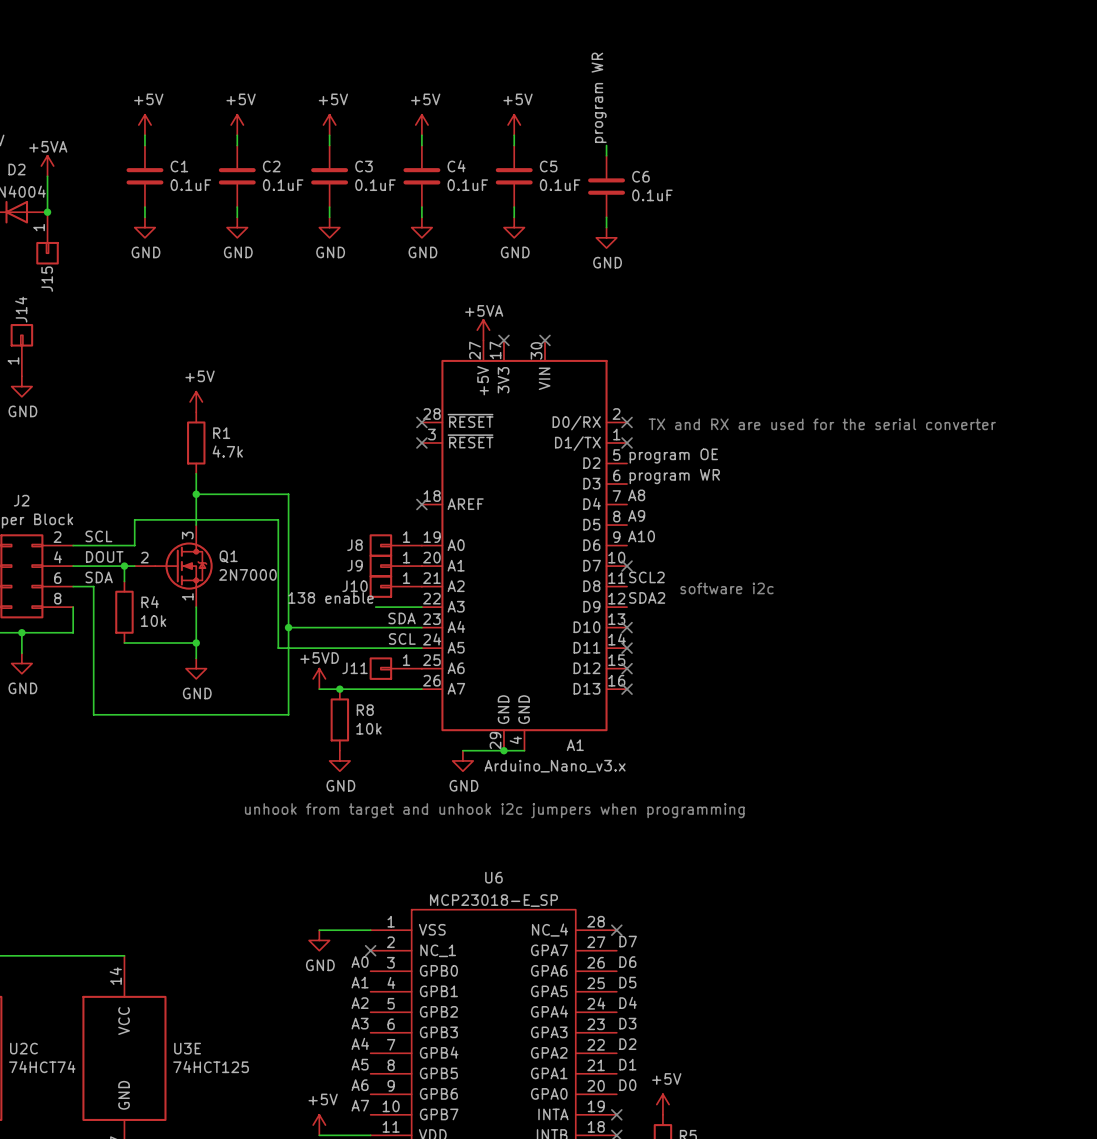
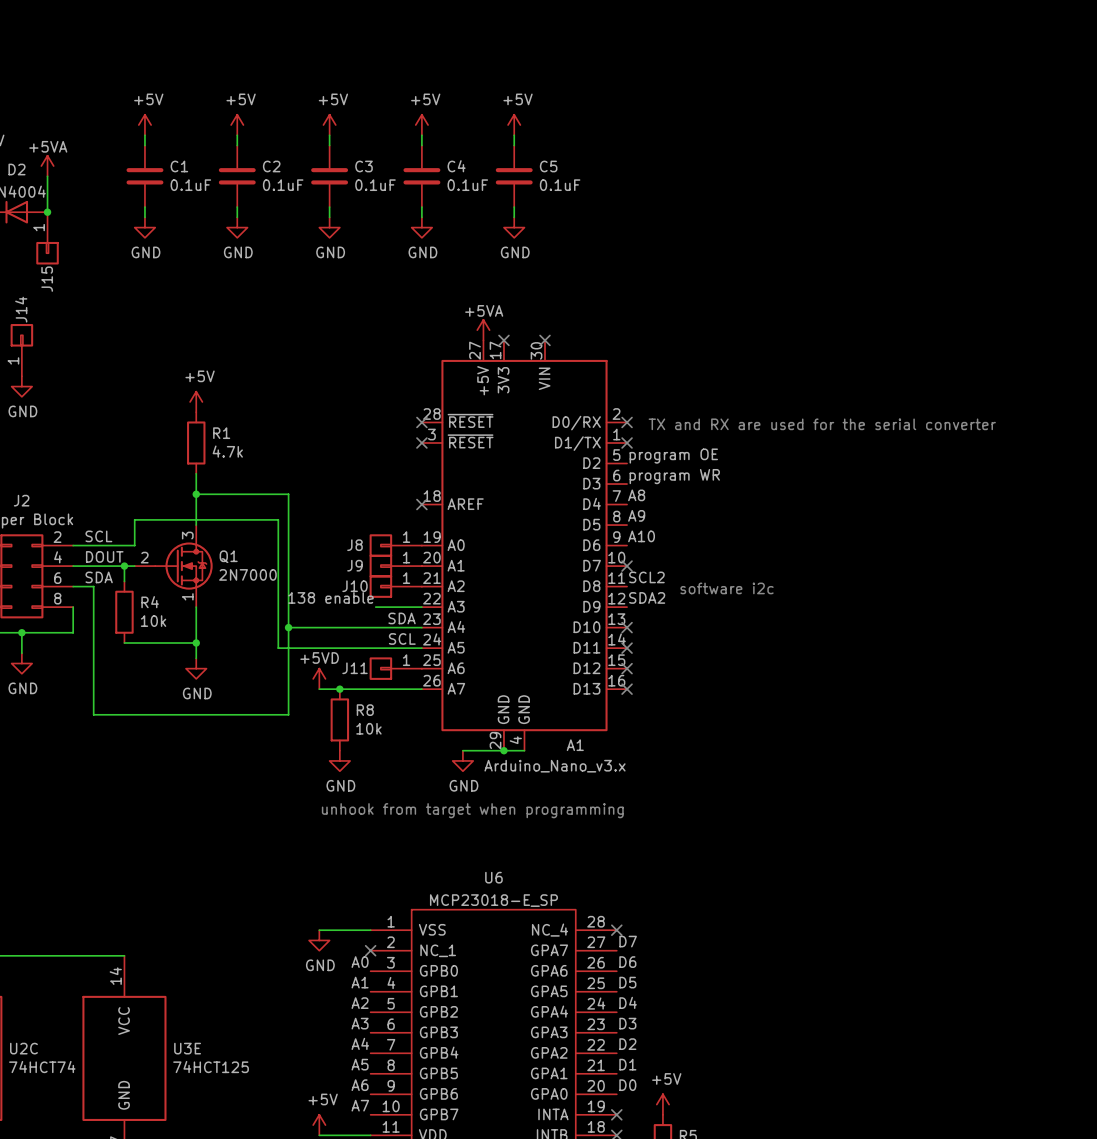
label: program WR (599, 97) -> none
wire: (606, 145) (606, 155) -> none
C6: 0.1uF (606, 186) -> none
wire: (606, 217) (606, 227) -> none
power symbol: GND (606, 237) -> none
text: unhook from target and unhook i2c jumpers when programming (494, 810) -> unhook from target when programming (472, 810)

